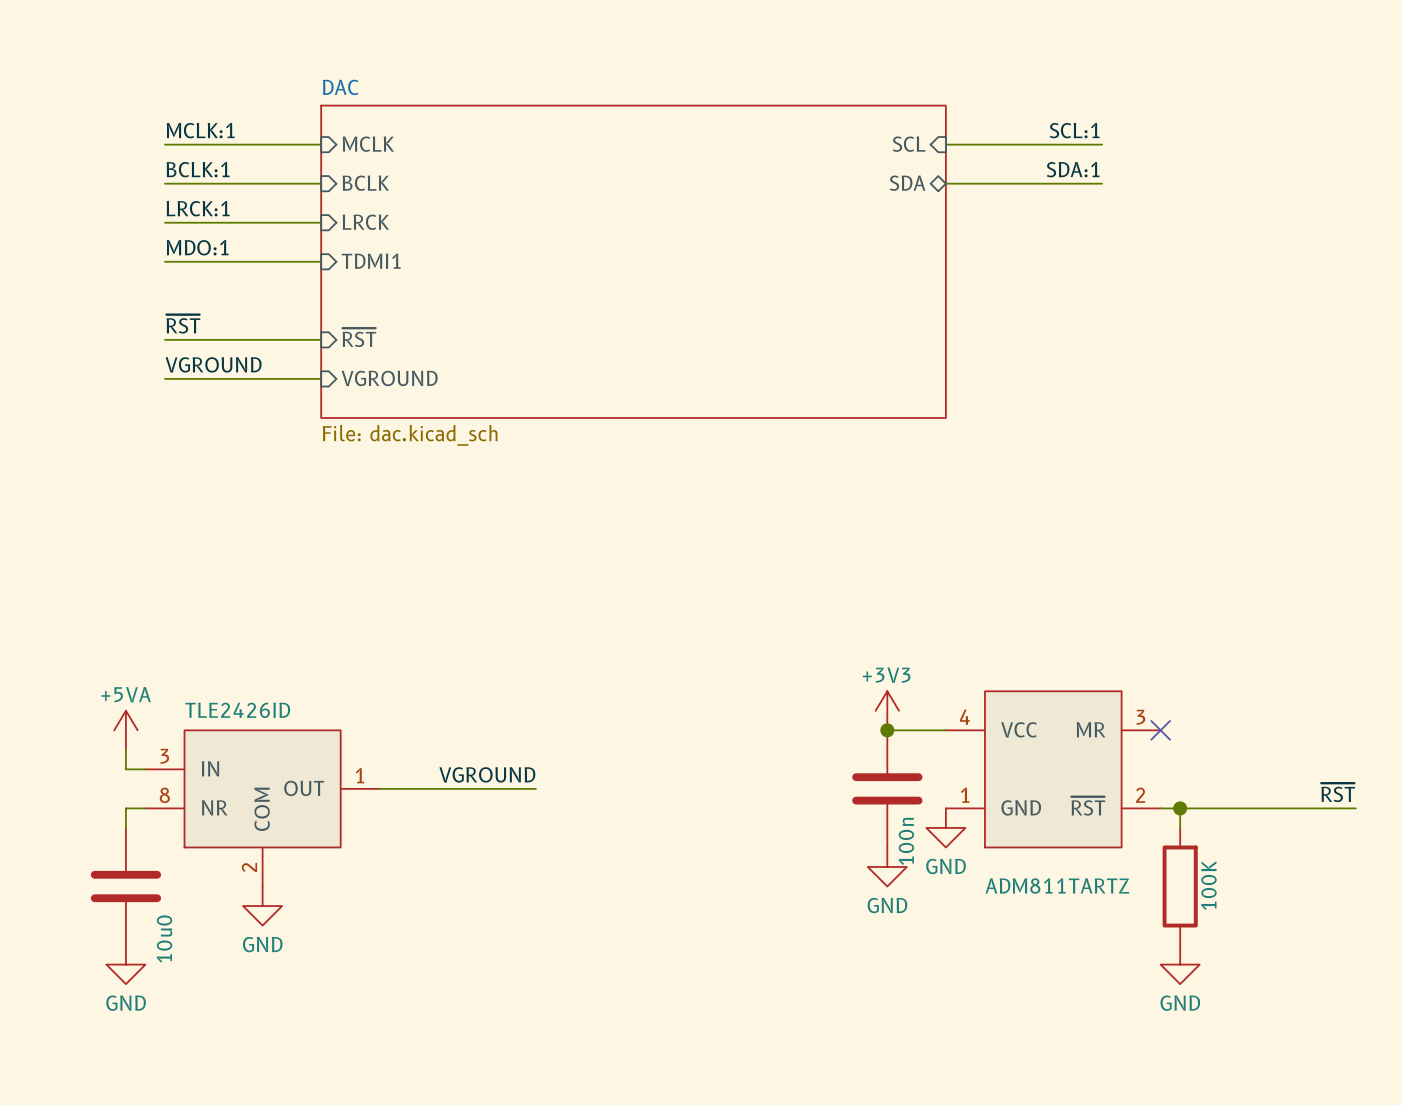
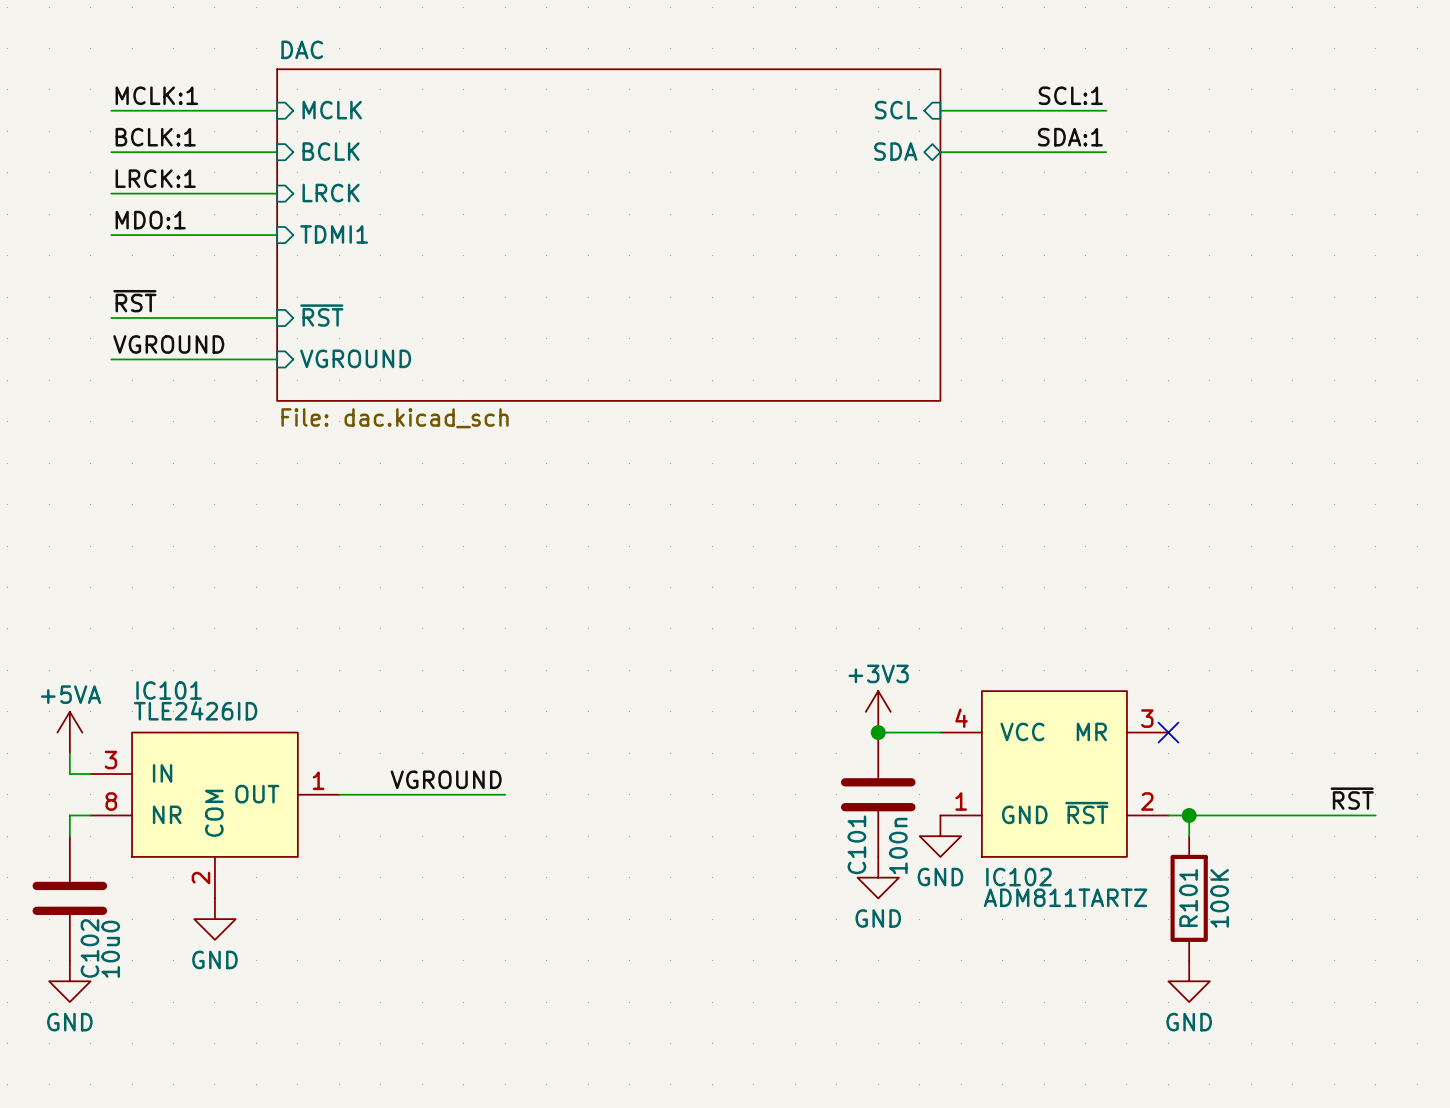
IC101 name: none -> IC101 (169, 690)
C101 name: none -> C101 (856, 844)
IC102 name: none -> IC102 (1018, 877)
R101 name: none -> R101 (1188, 898)
C102 name: none -> C102 (89, 948)

